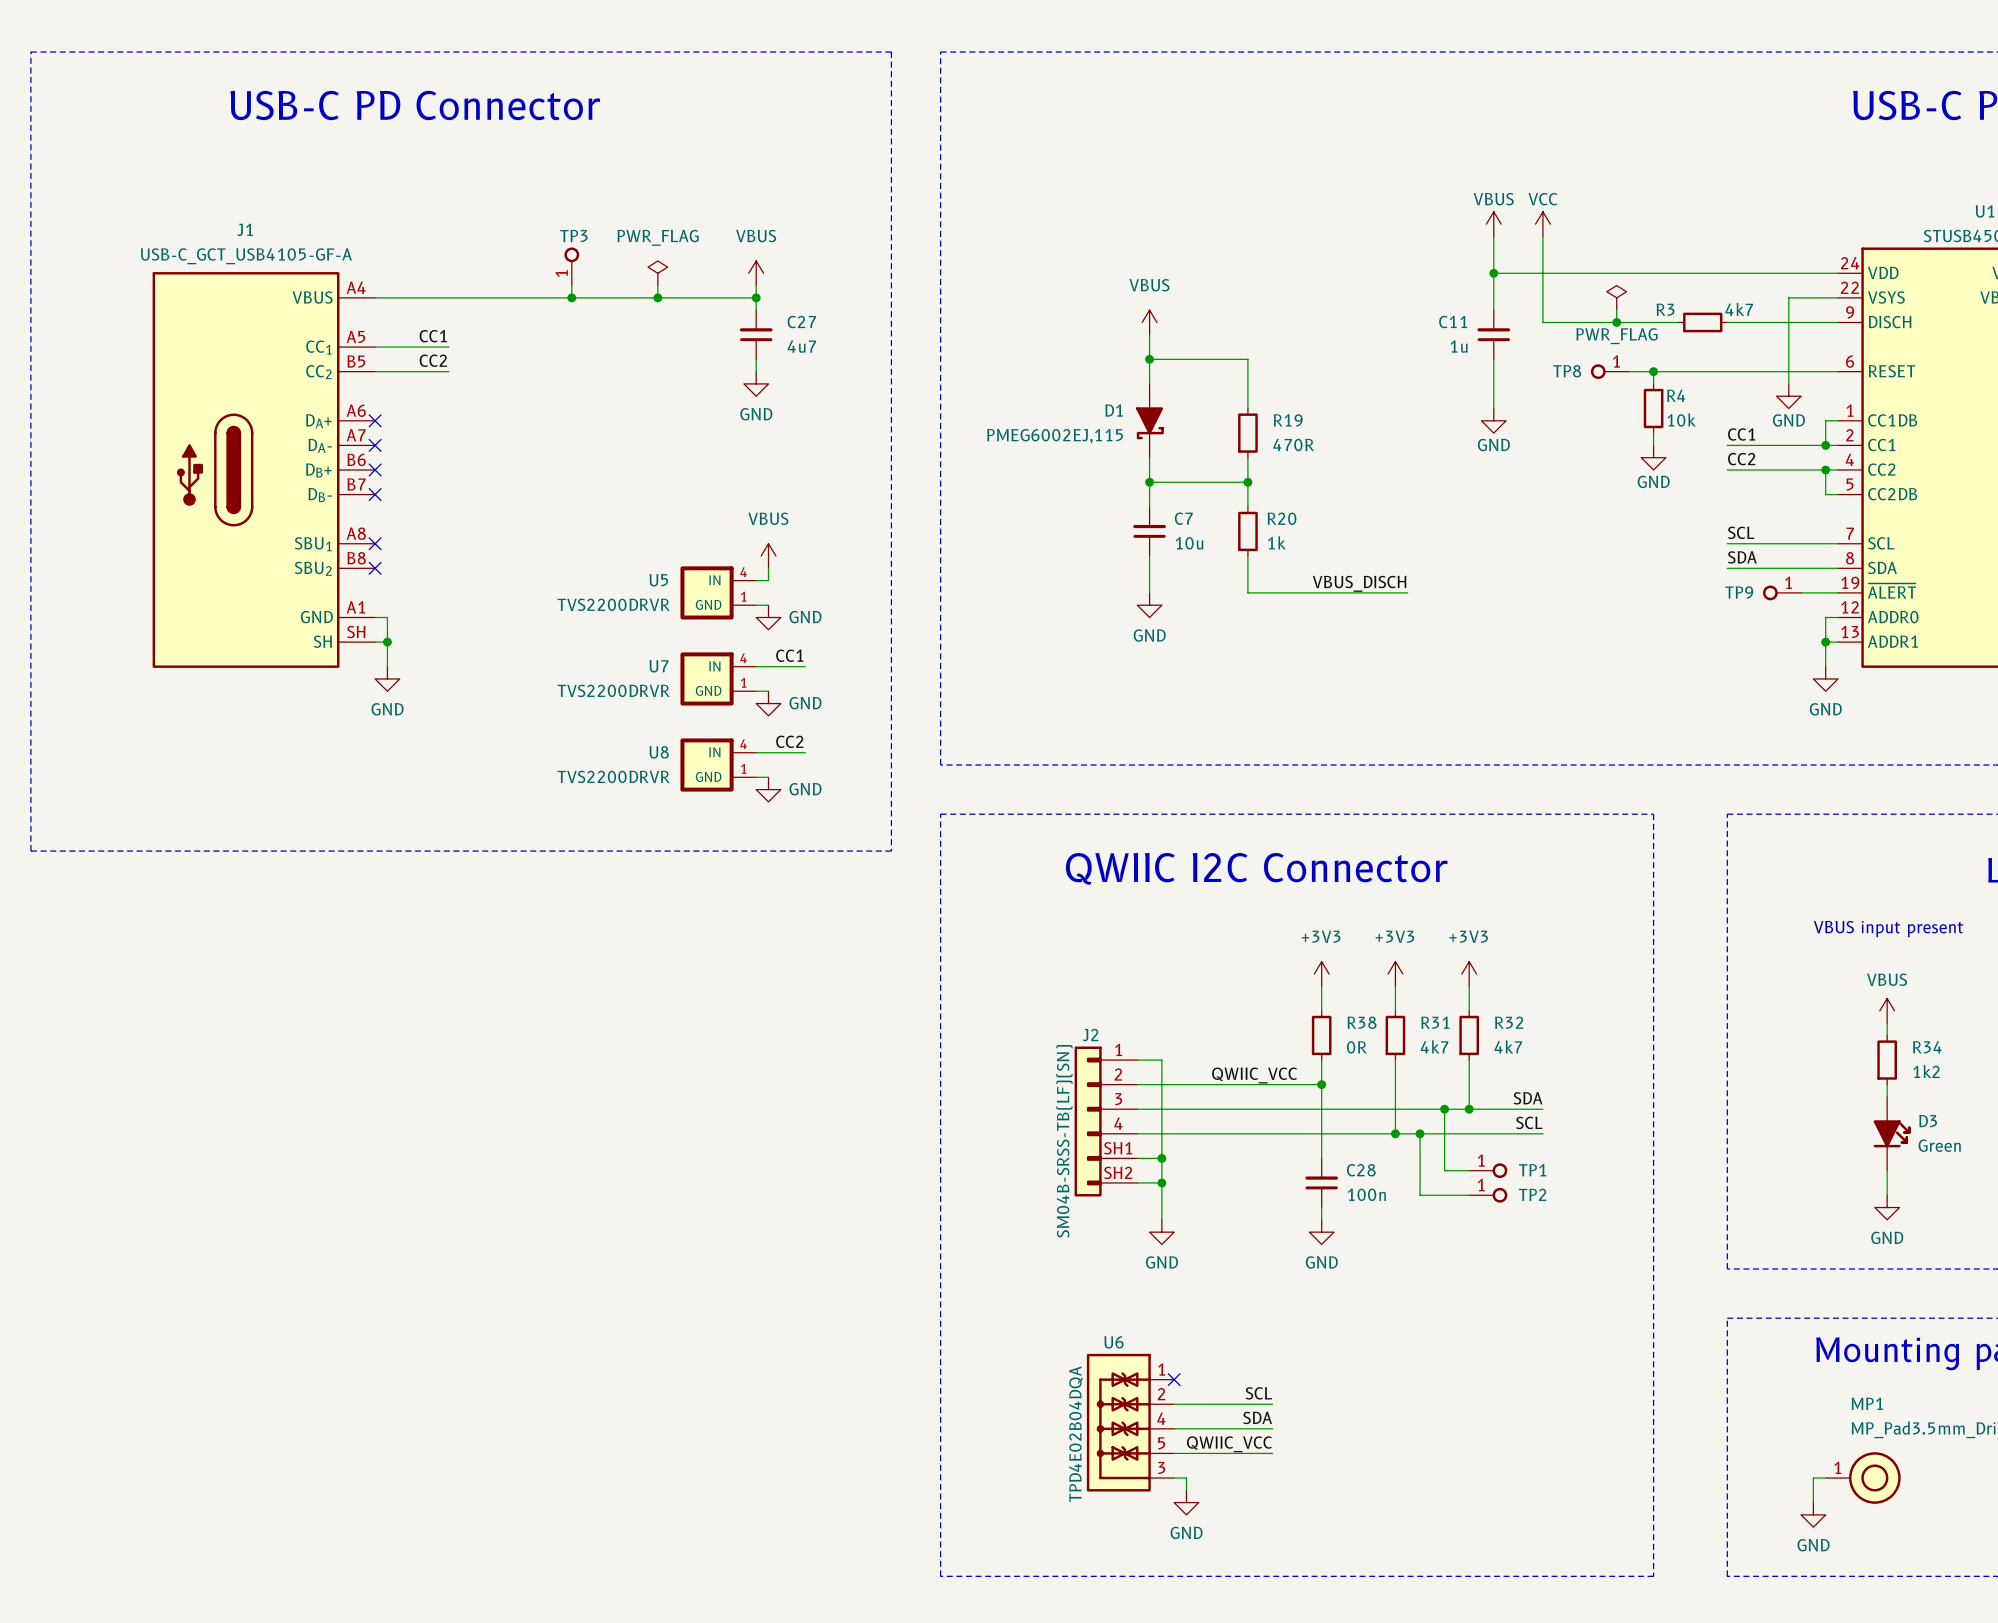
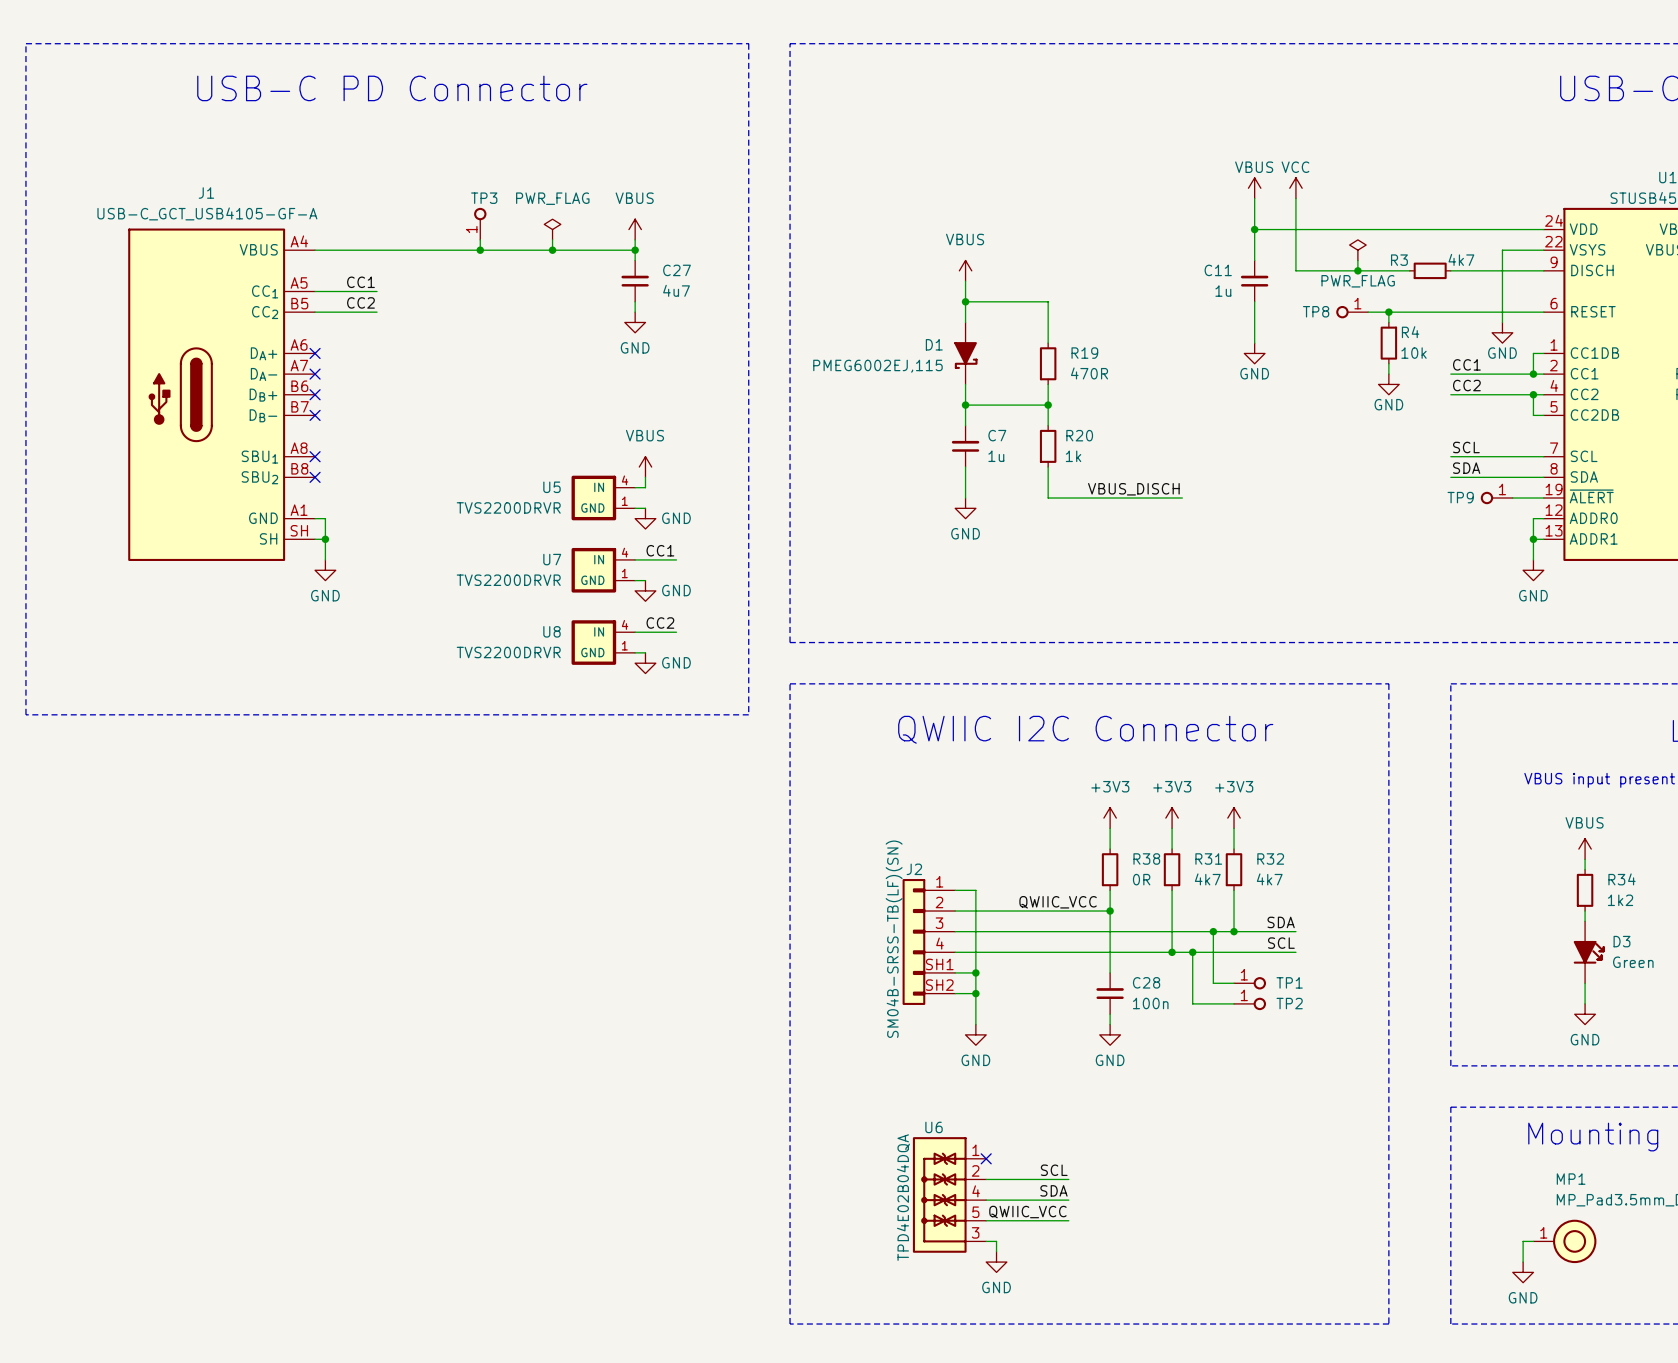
C7 text: 10u (1189, 543) -> 1u (996, 456)

